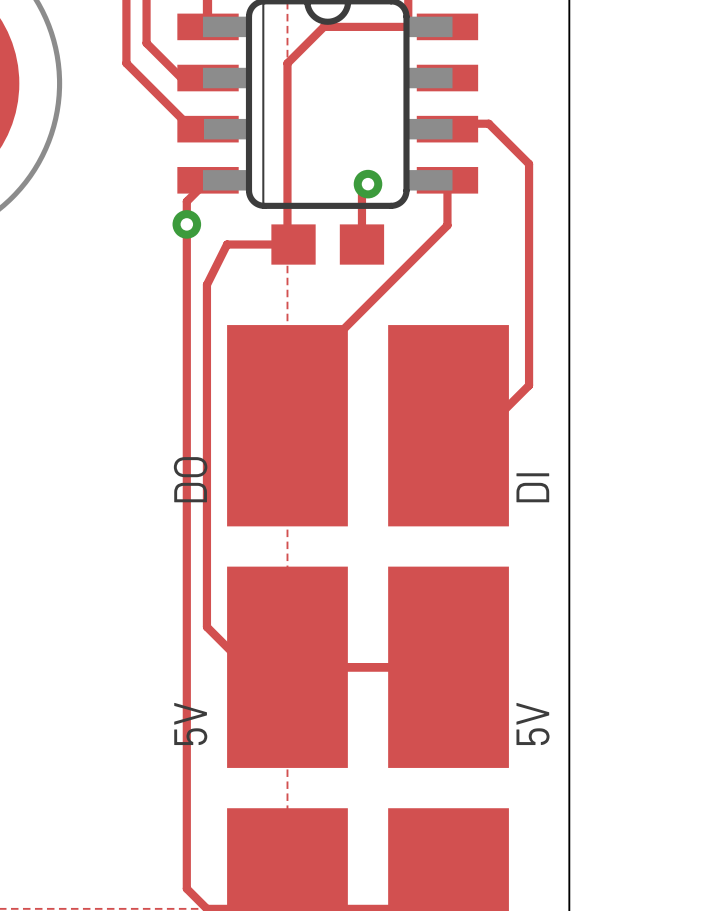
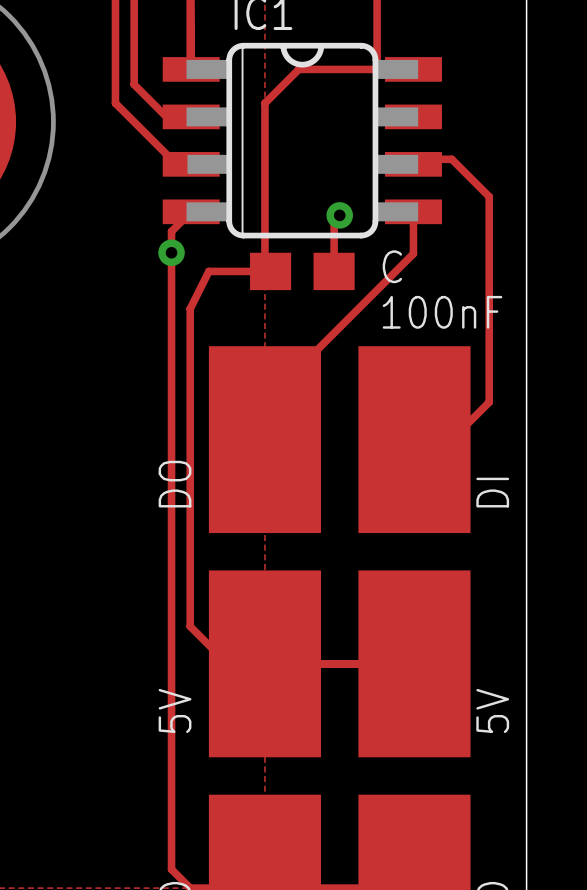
text: none -> C (392, 266)
text: none -> 100nF (442, 312)

